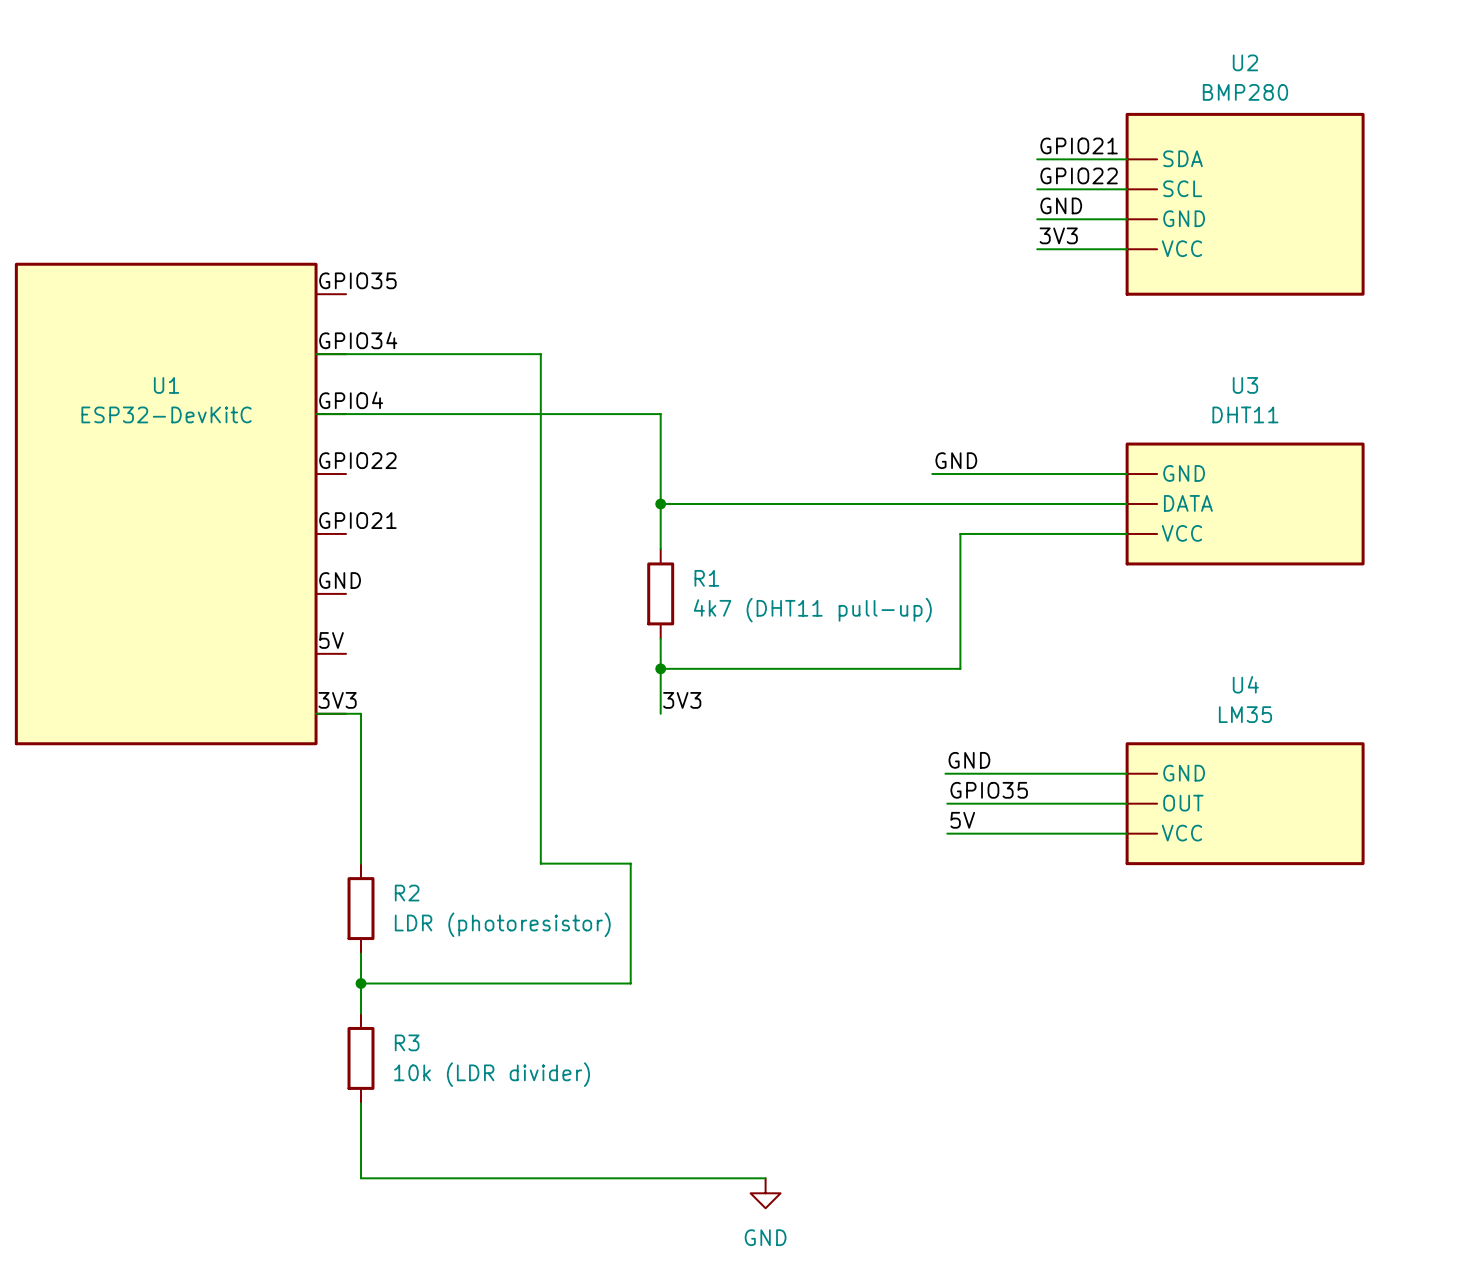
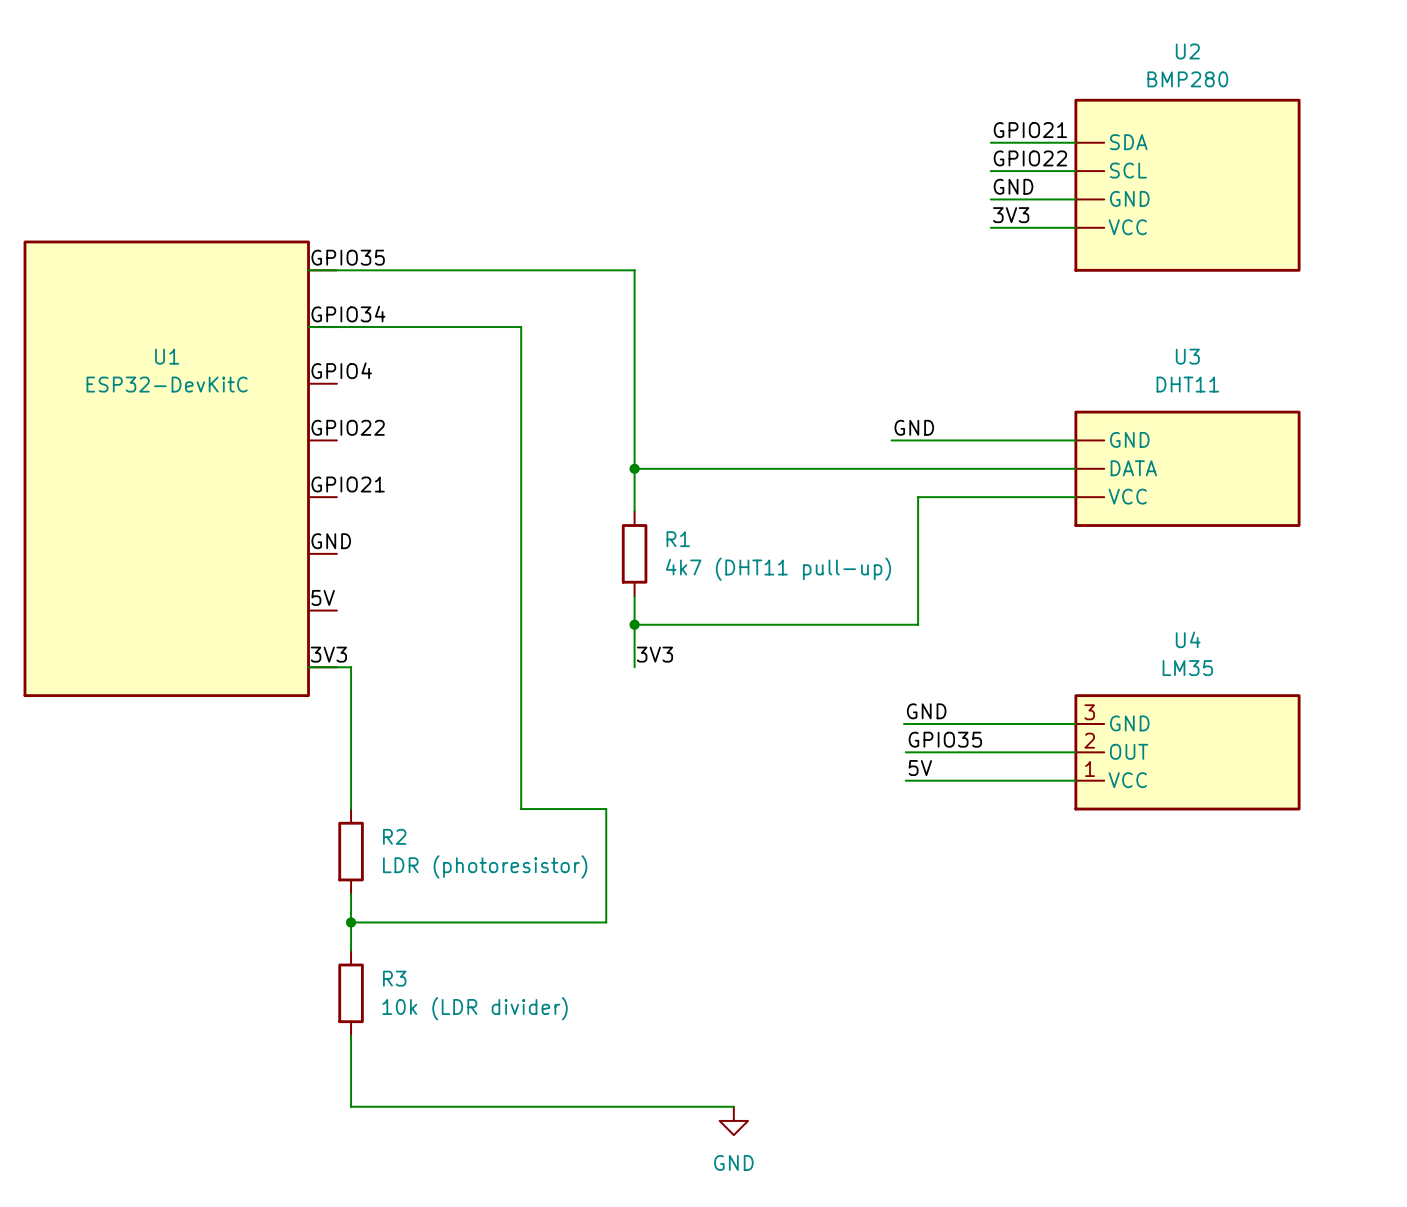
wire: (316, 414) (660, 414) -> (308, 270) (634, 270) (634, 383)
U4 pin number: none -> 3 (1089, 712)
U4 pin number: none -> 2 (1089, 740)
U4 pin number: none -> 1 (1090, 769)

